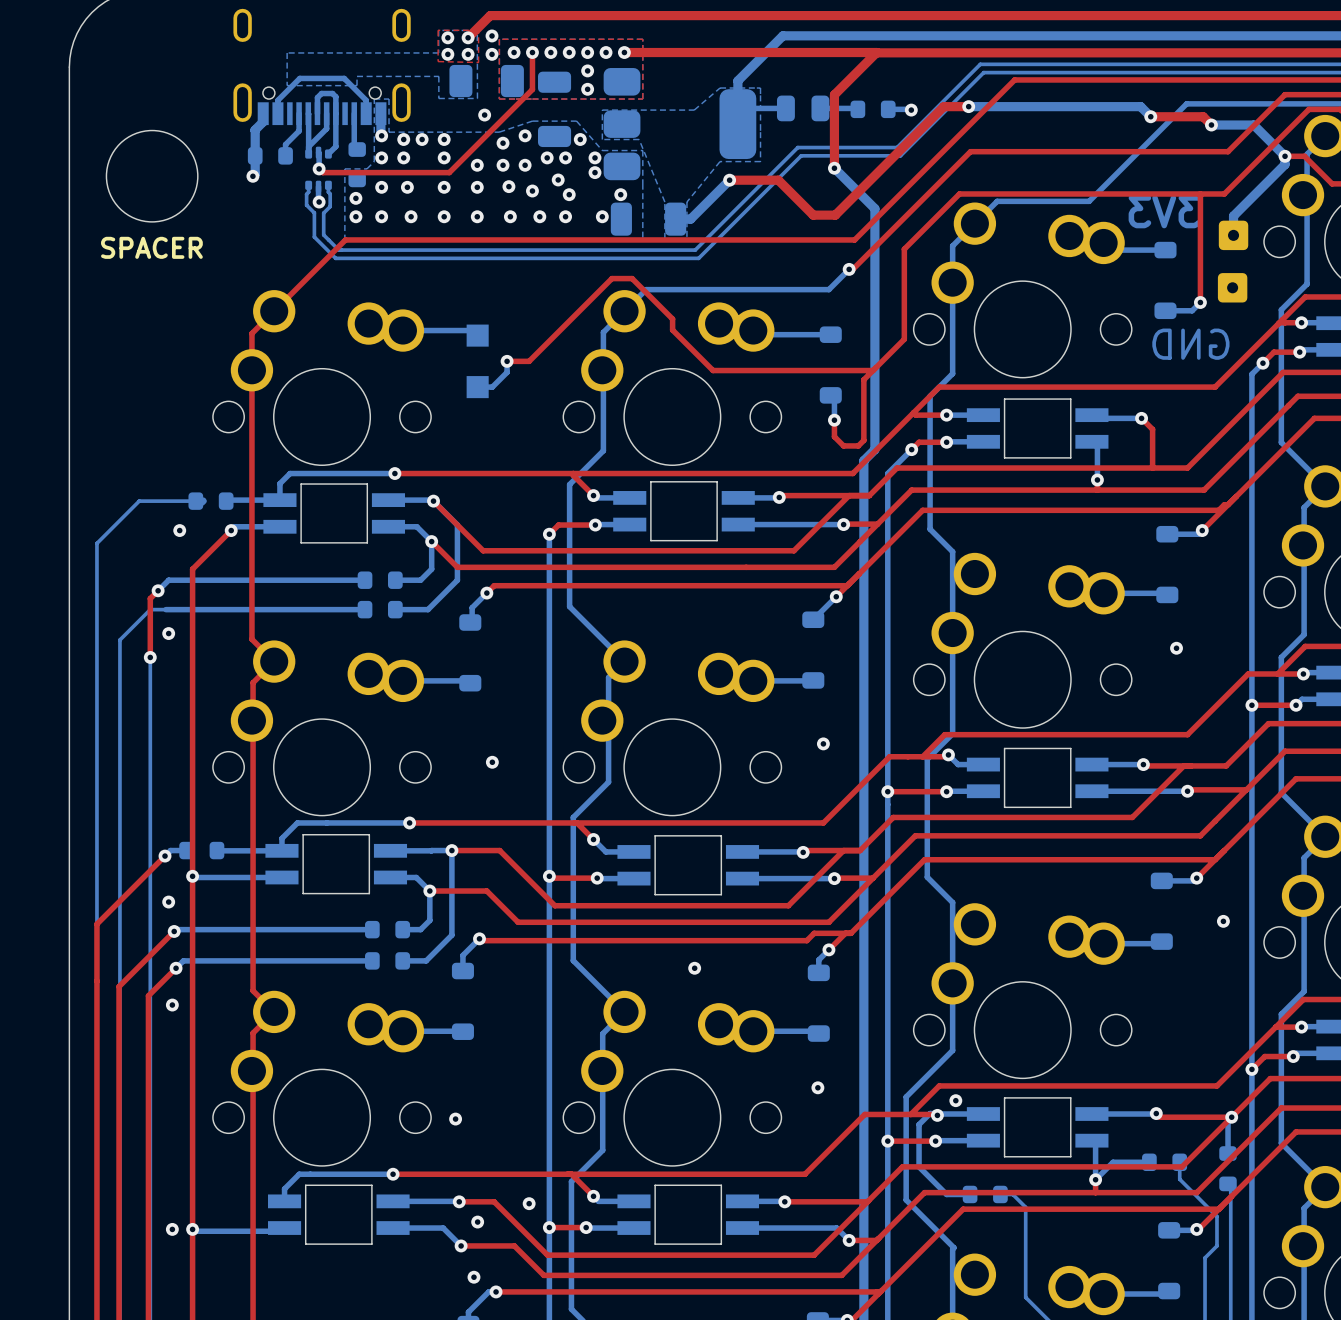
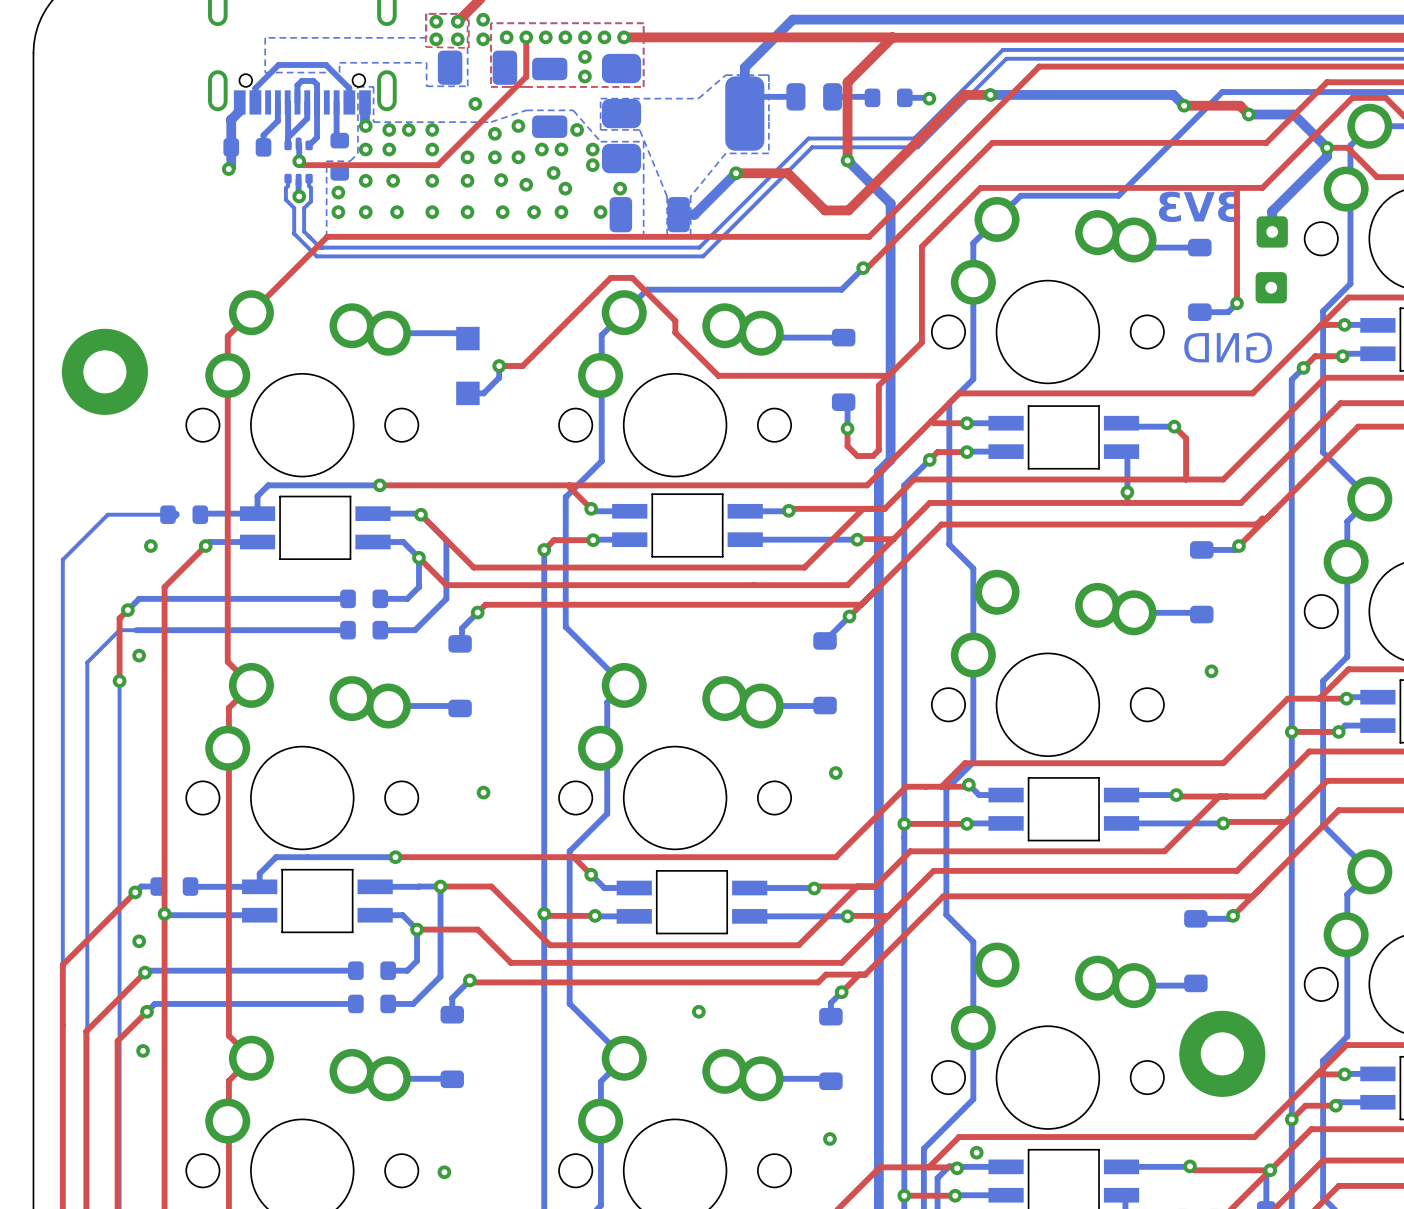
round board edge: [105, 130, 199, 223] -> none
text: SPACER (151, 247) -> none
part: none -> (104, 371)
via: (1223, 921) -> none
part: none -> (1222, 1053)

